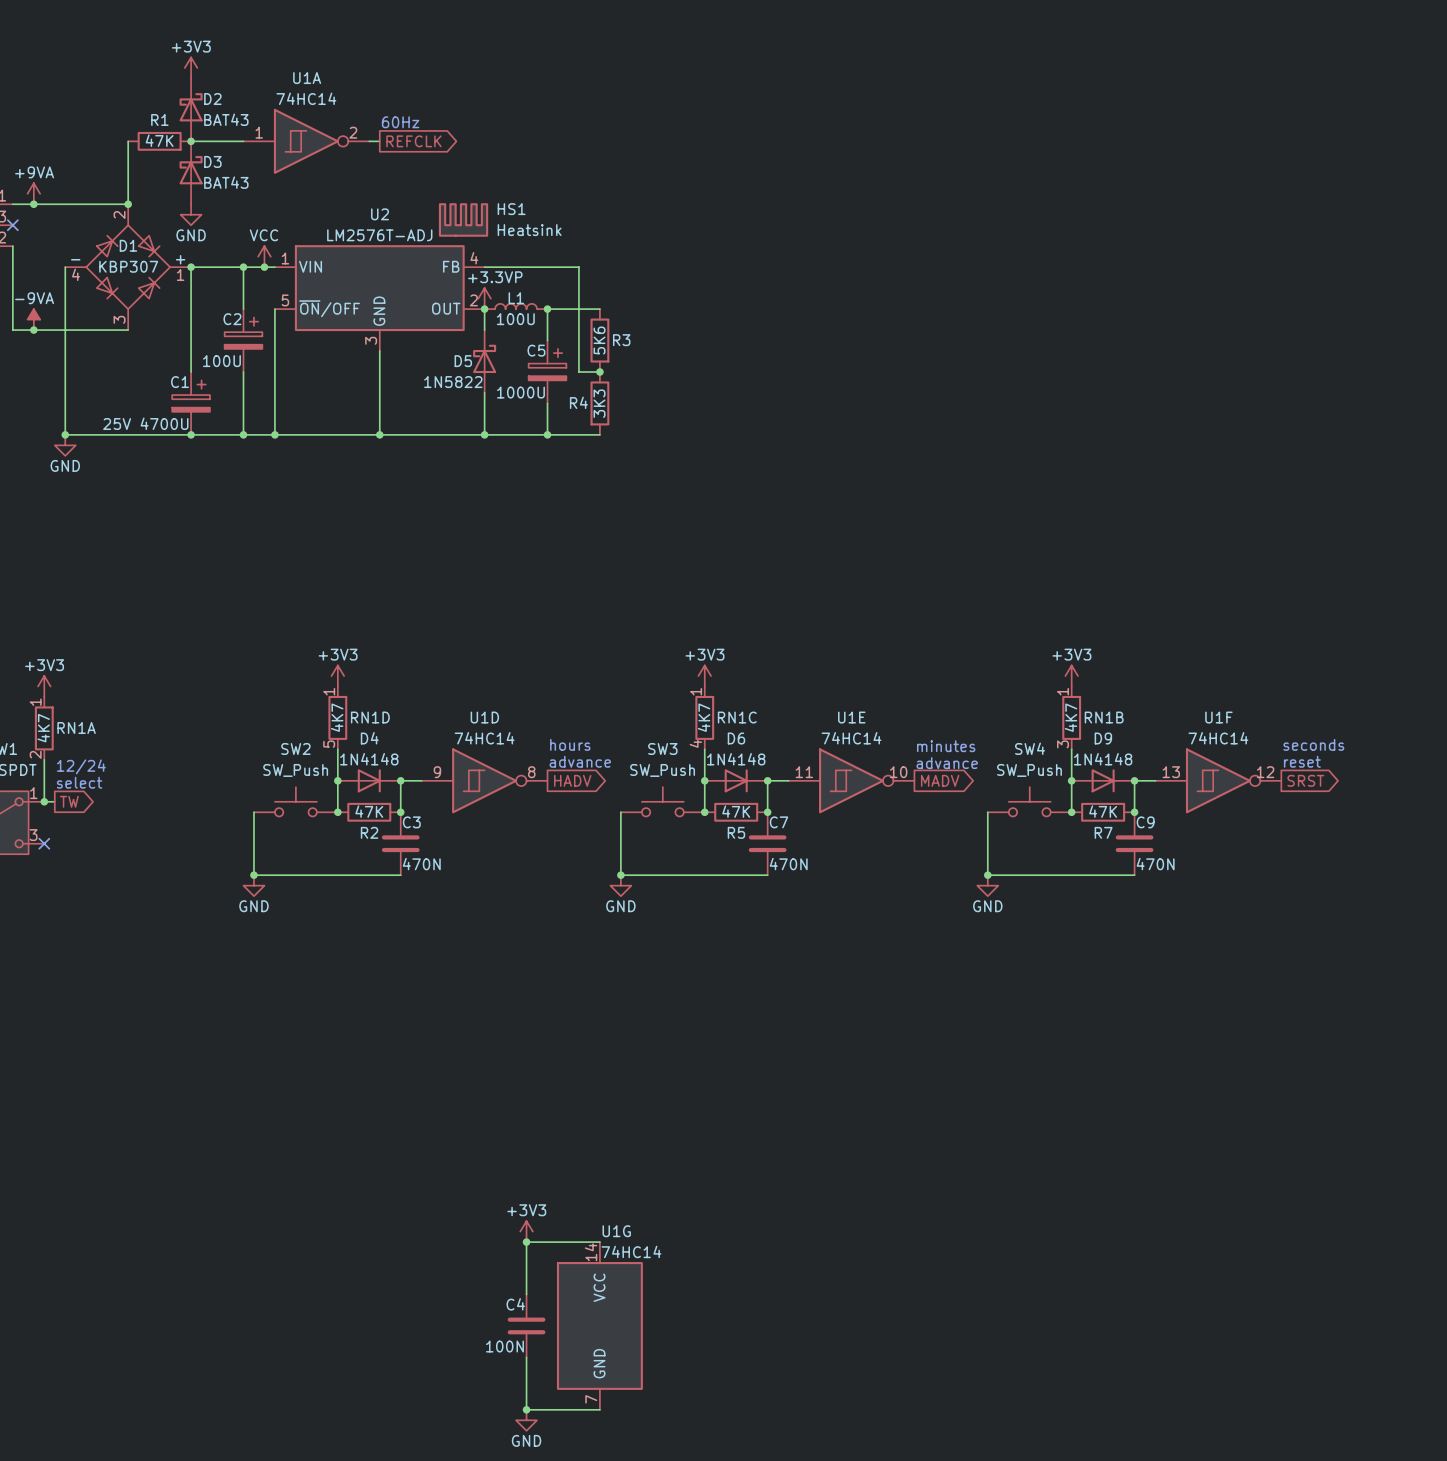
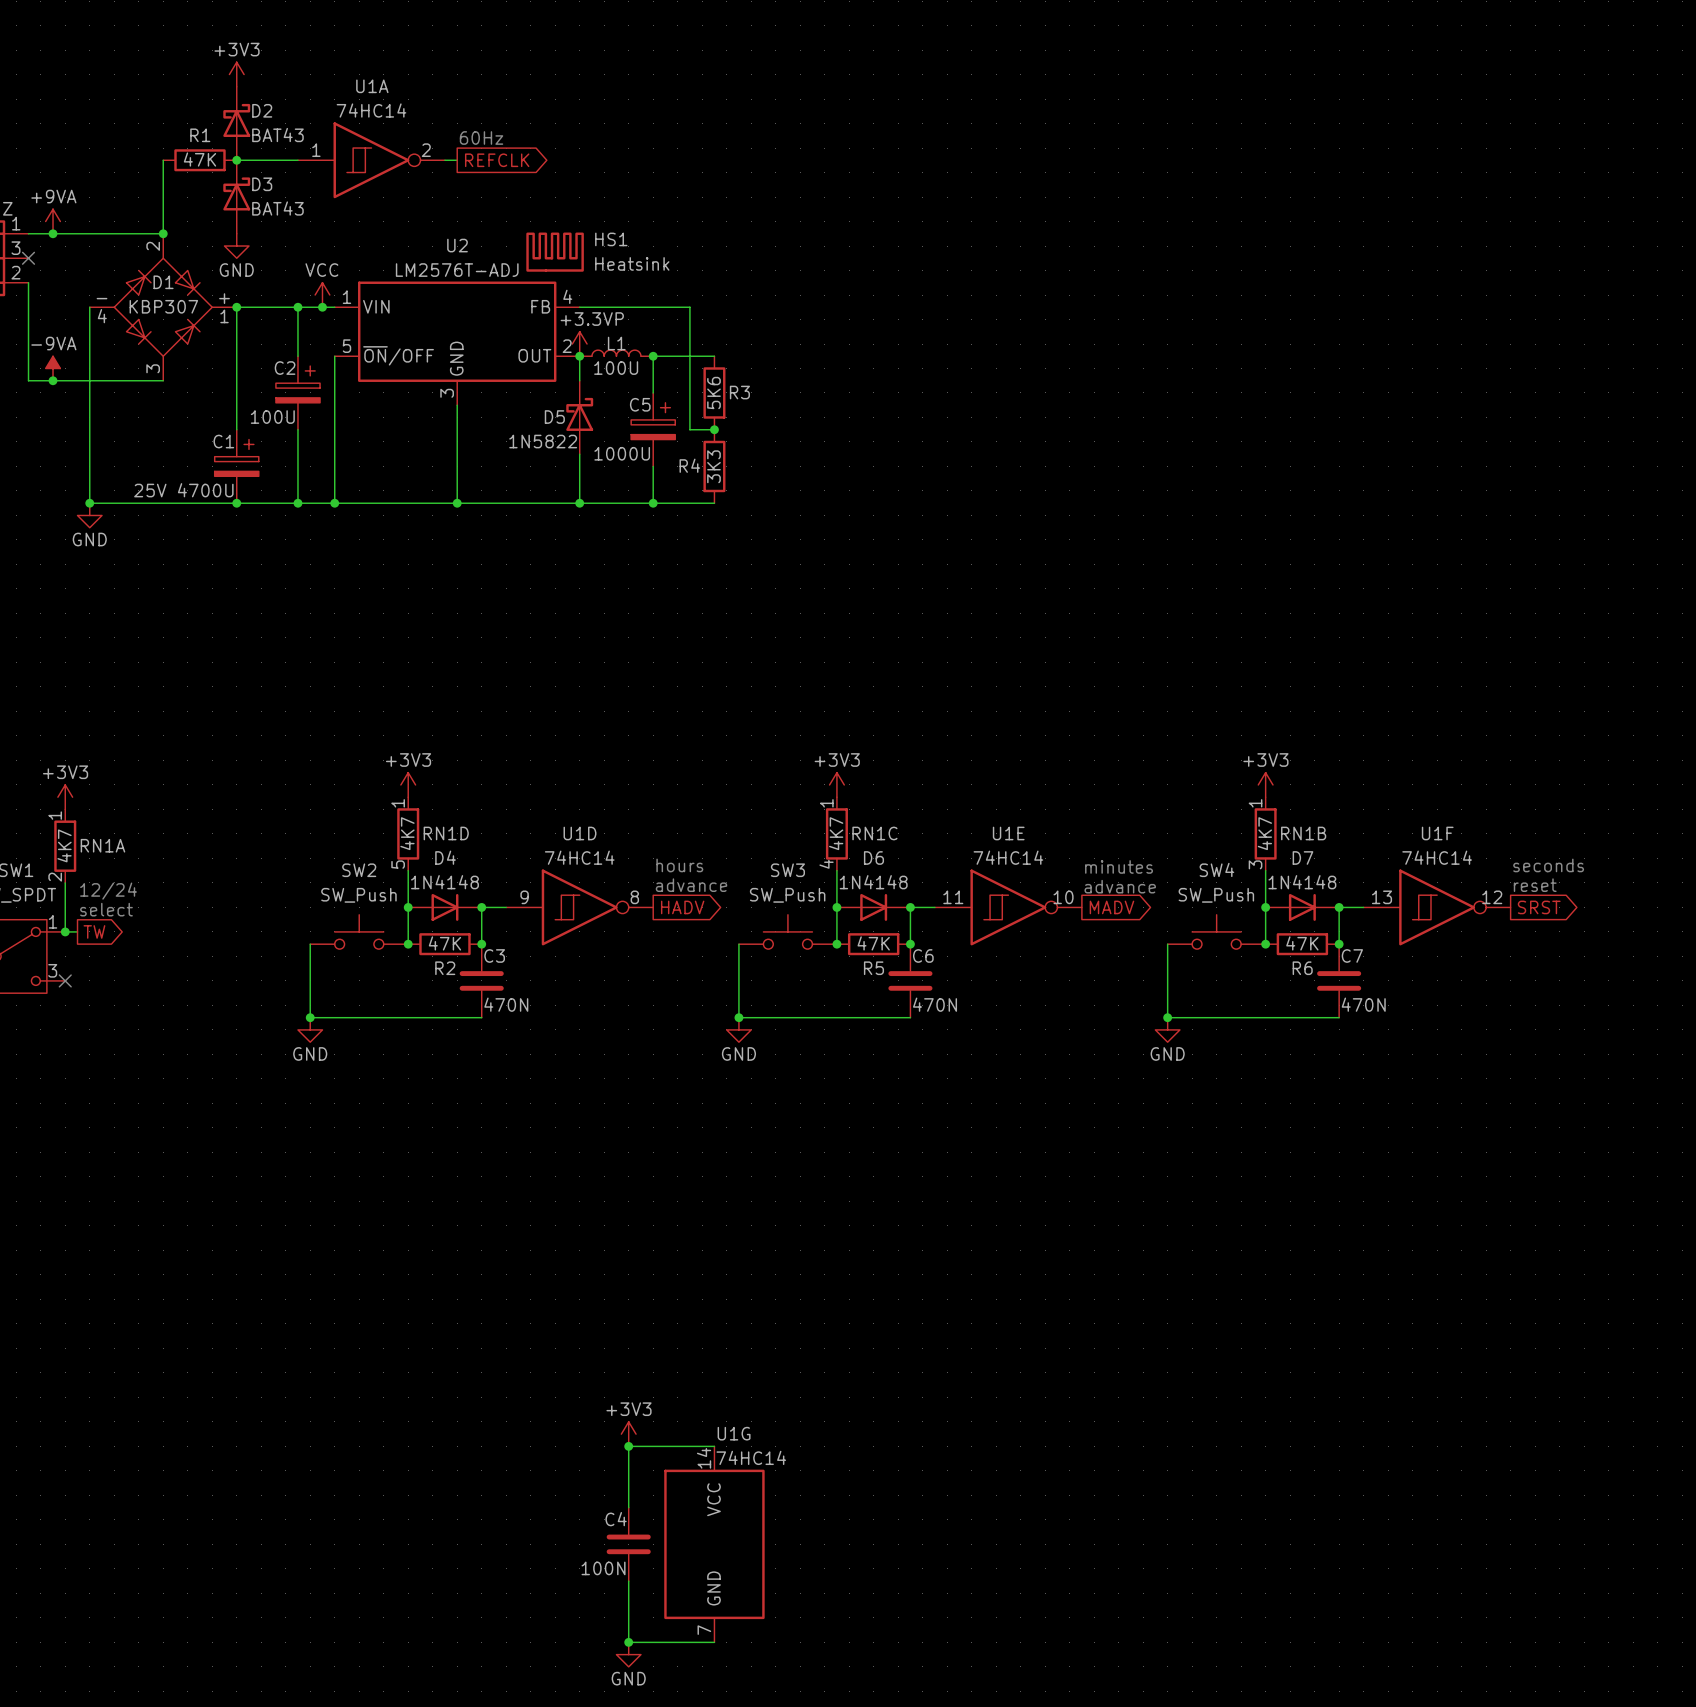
D9 name: D9 (1103, 738) -> D7 (1302, 857)
C7 name: C7 (778, 822) -> C6 (923, 955)
C9 name: C9 (1145, 822) -> C7 (1352, 955)
R7 name: R7 (1103, 832) -> R6 (1302, 968)

